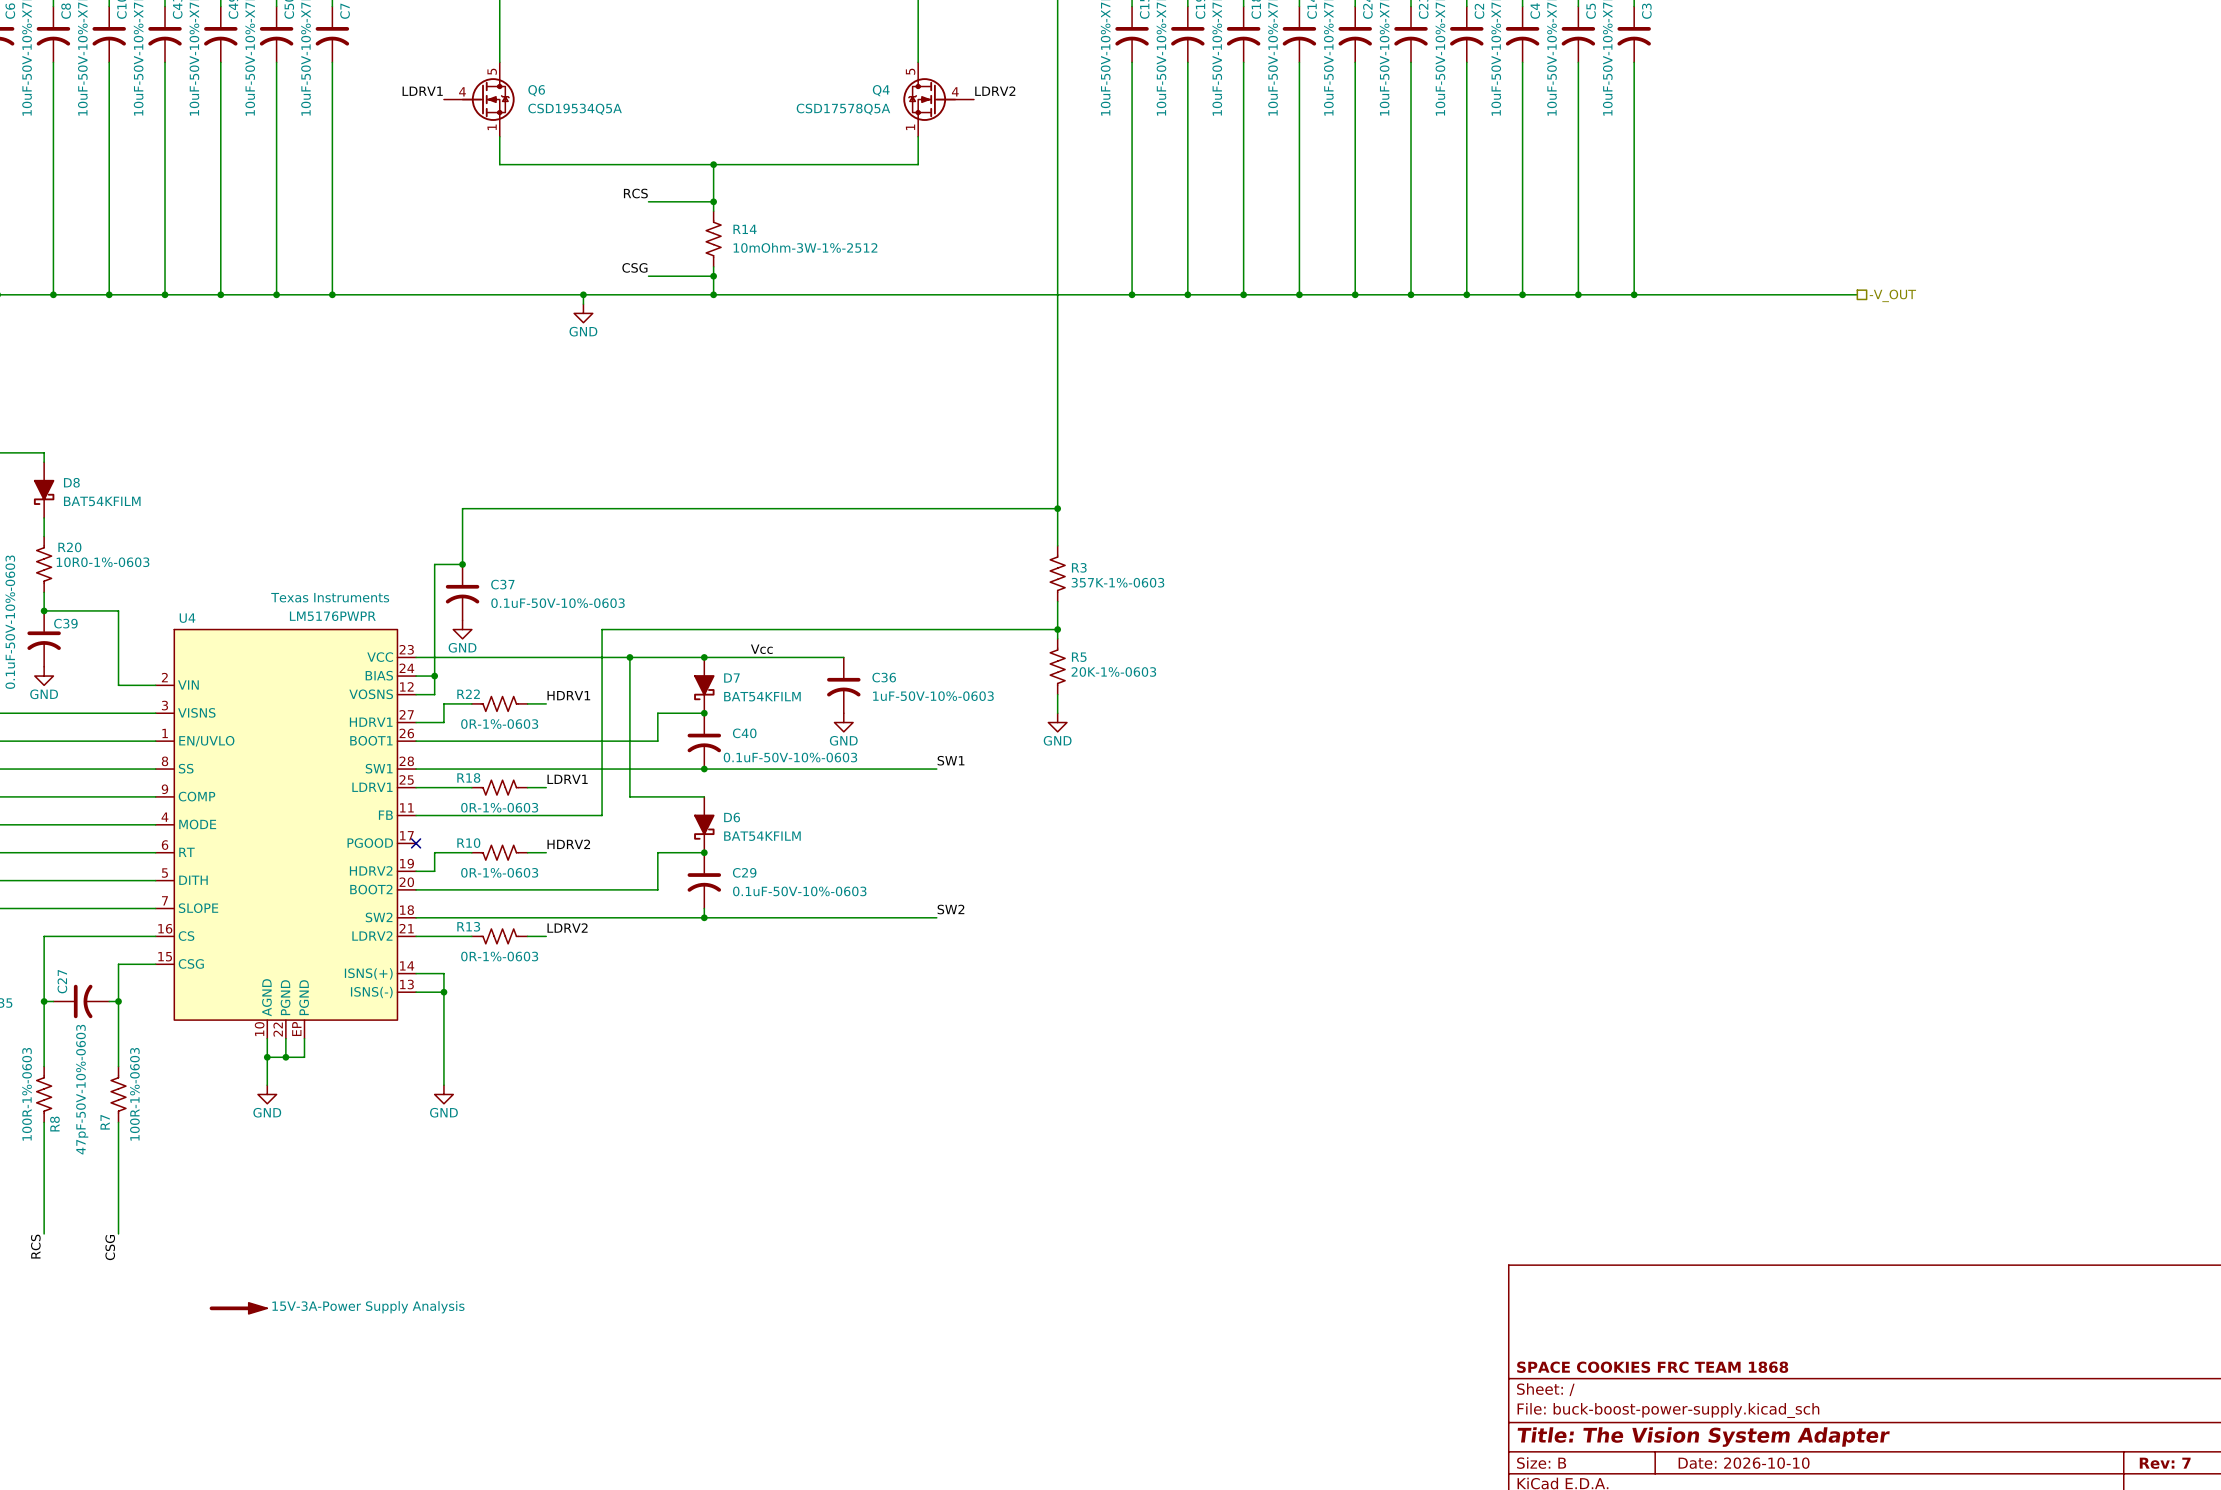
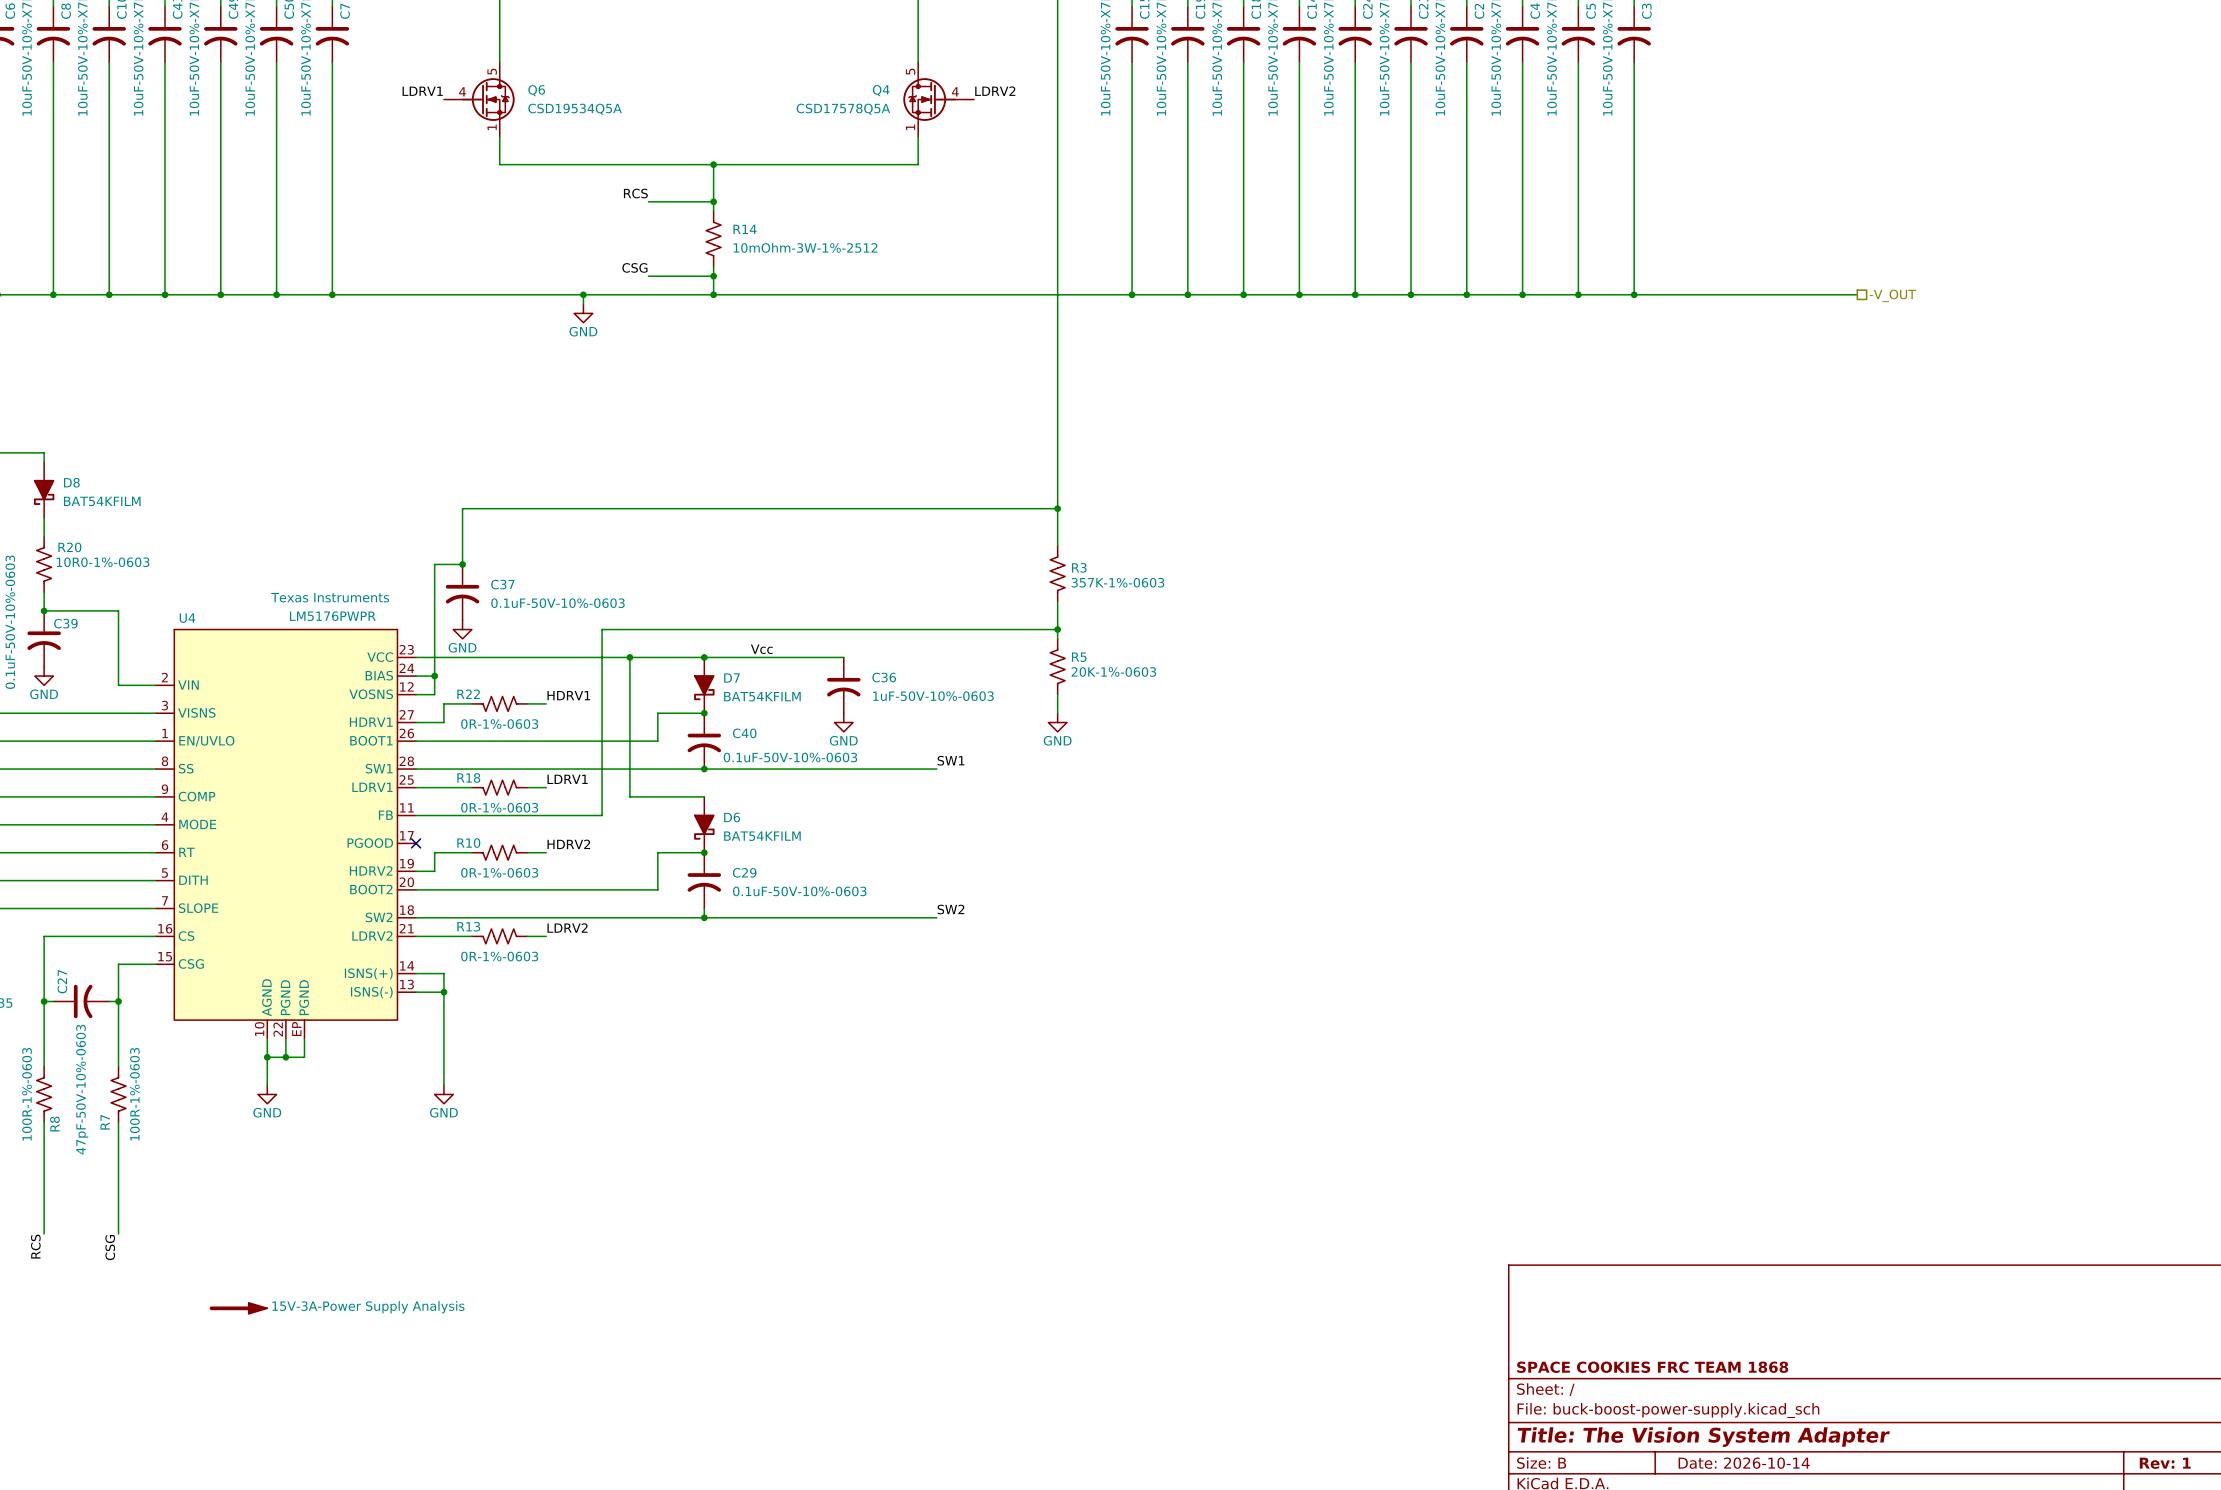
title block: Date: 2026-10-10 (1744, 1463) -> Date: 2026-10-14 (1744, 1463)
title block: Rev: 7 (2165, 1463) -> Rev: 1 (2165, 1463)

